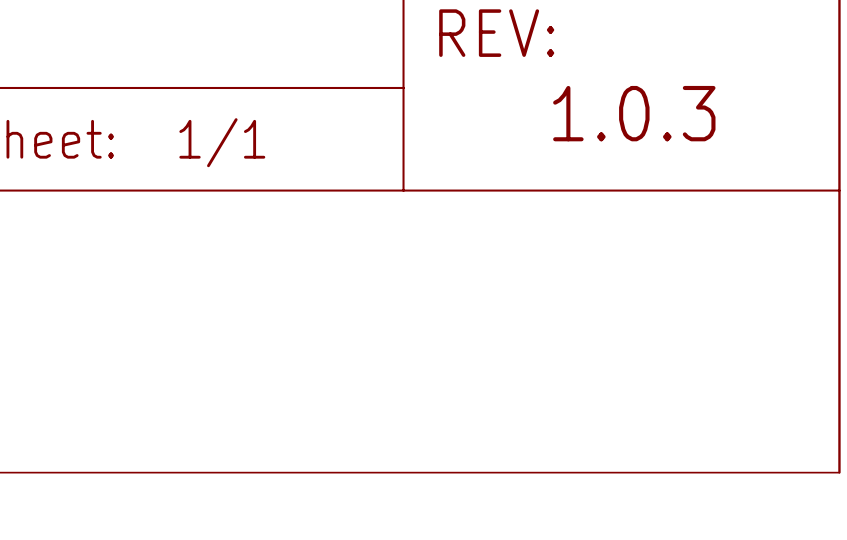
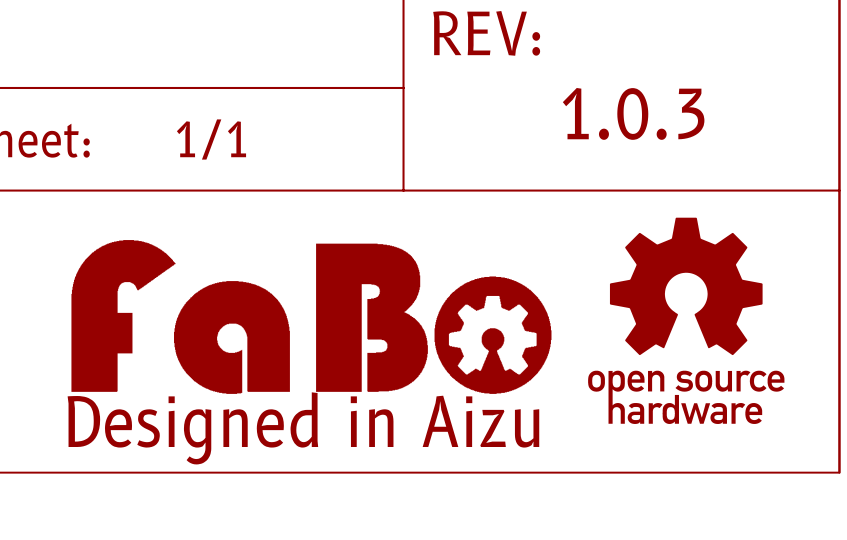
part: none -> (311, 316)
part: none -> (686, 320)

